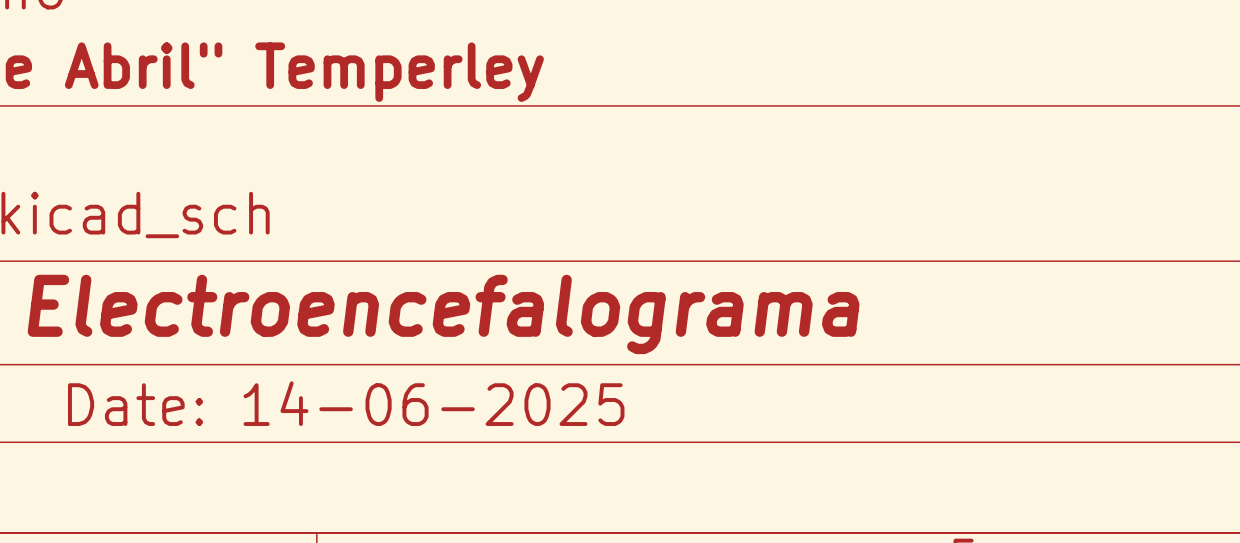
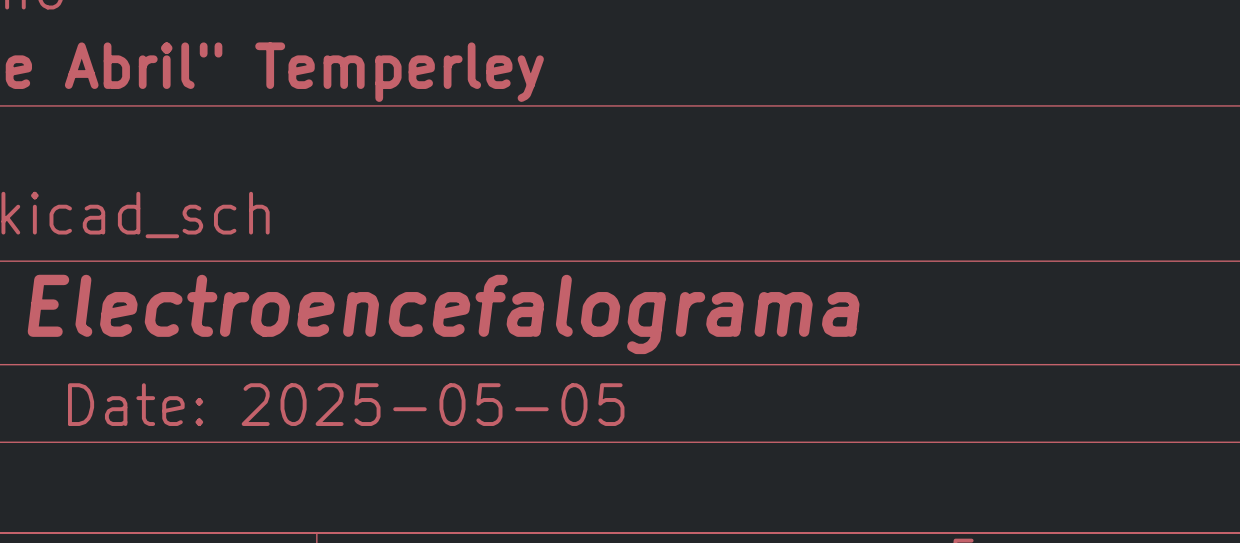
title block: Date: 14-06-2025 (346, 403) -> Date: 2025-05-05 (346, 404)

